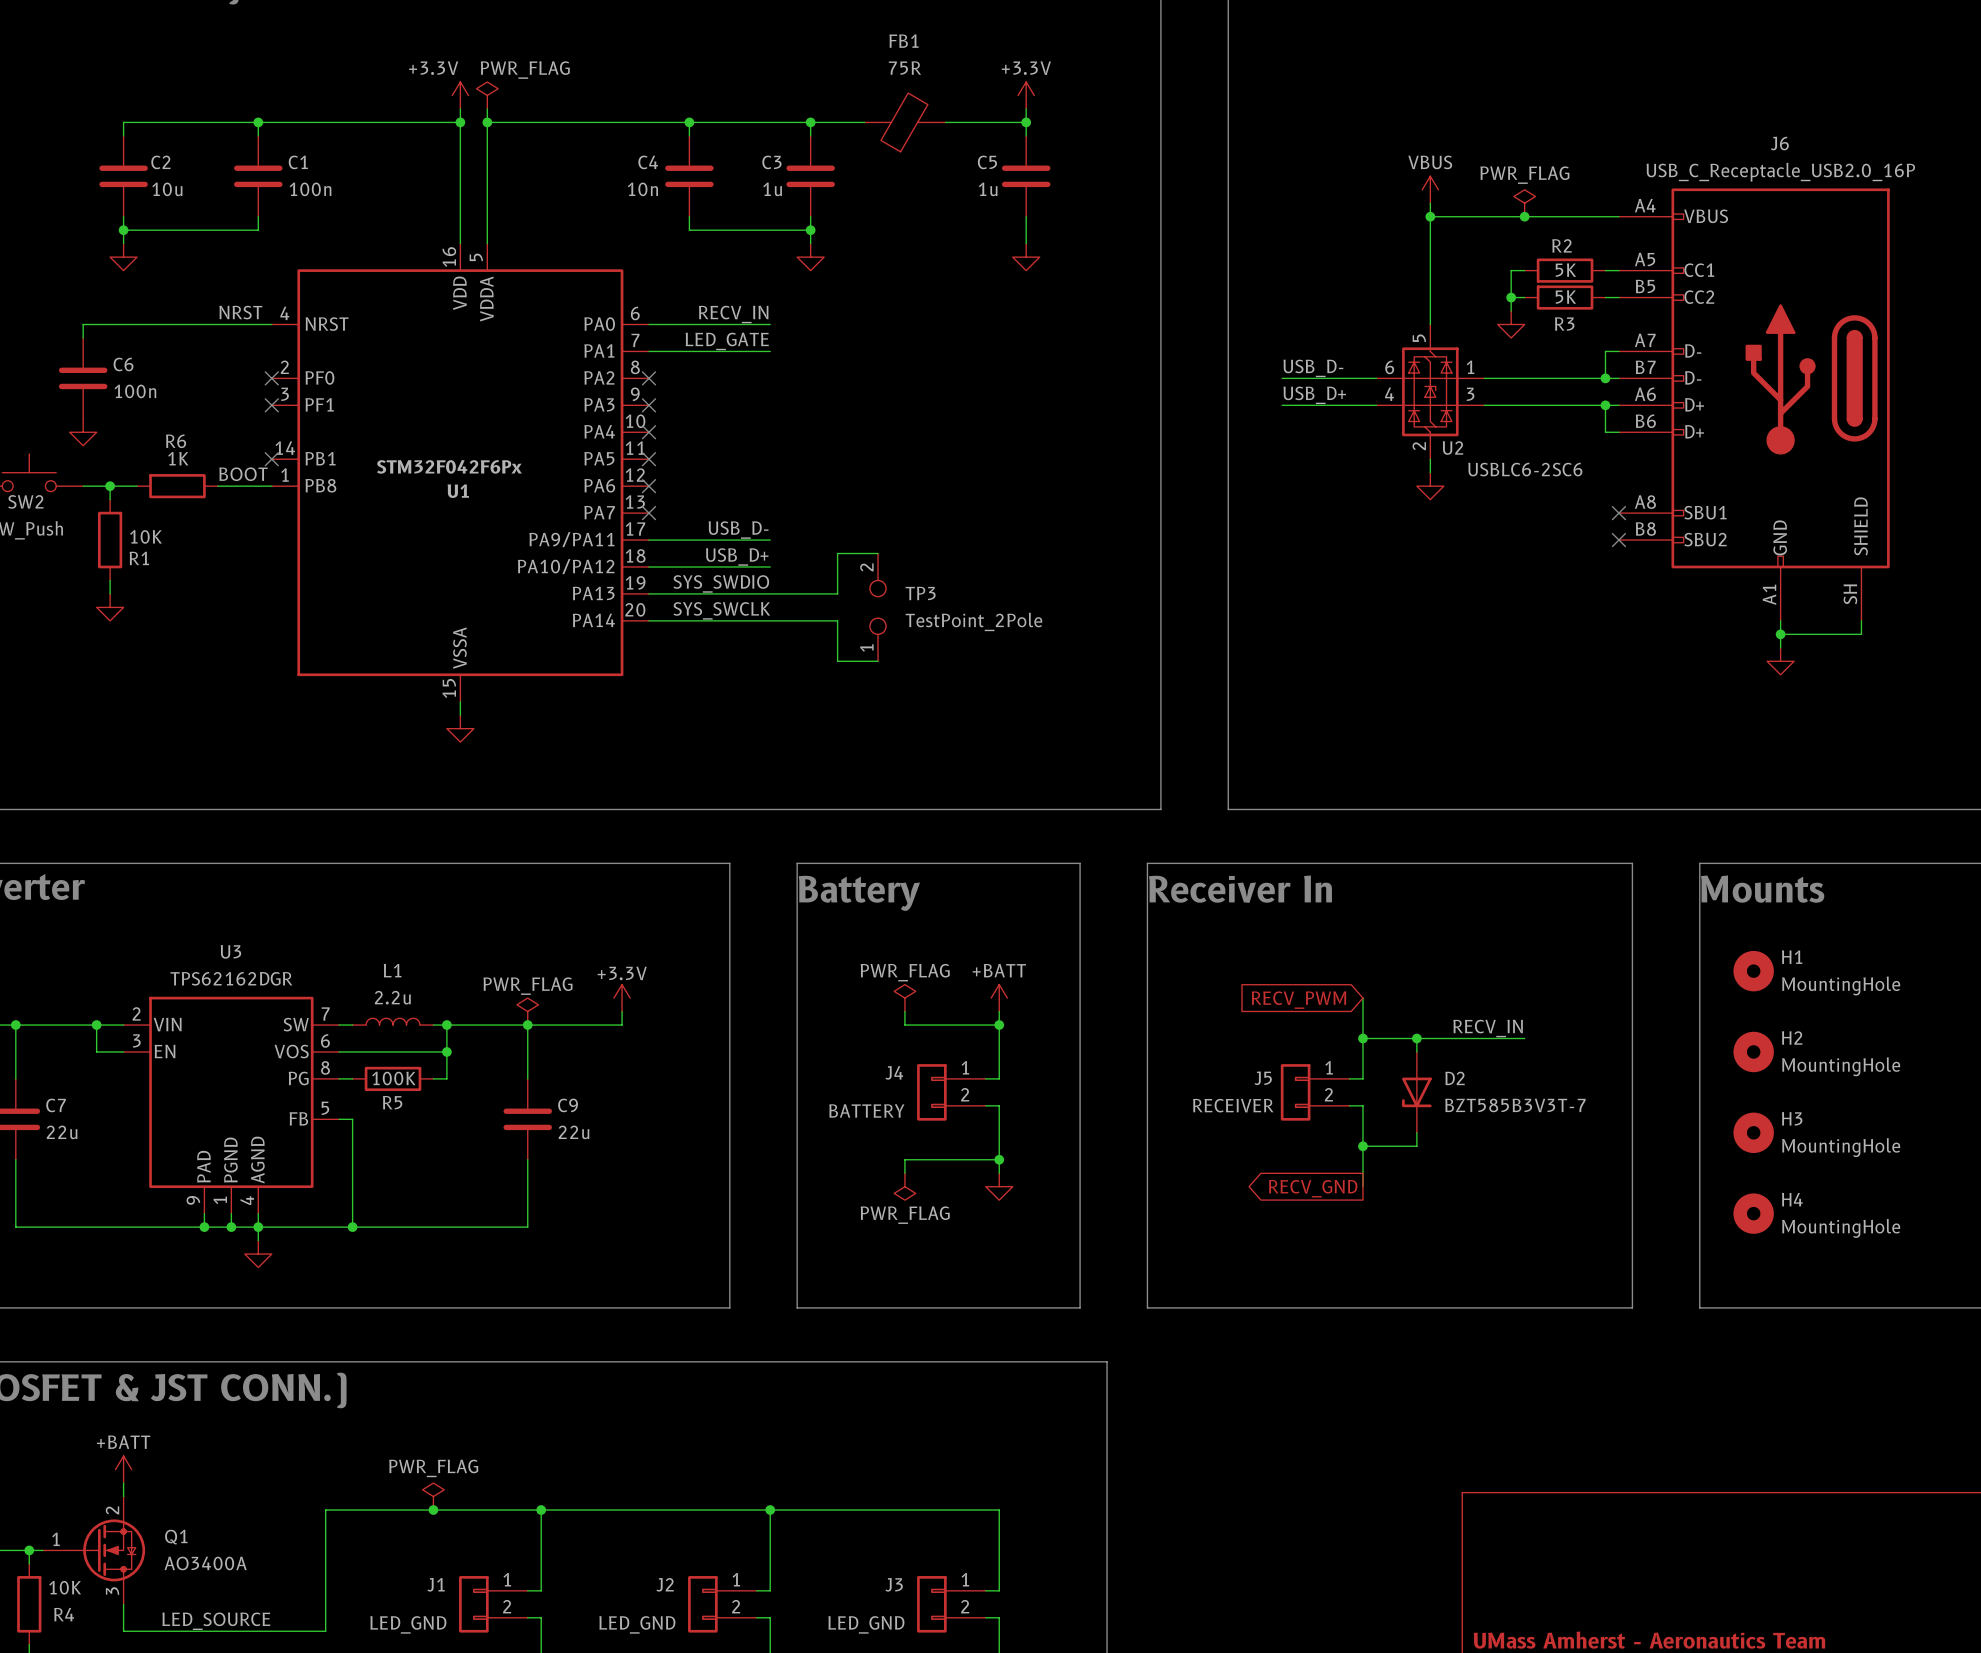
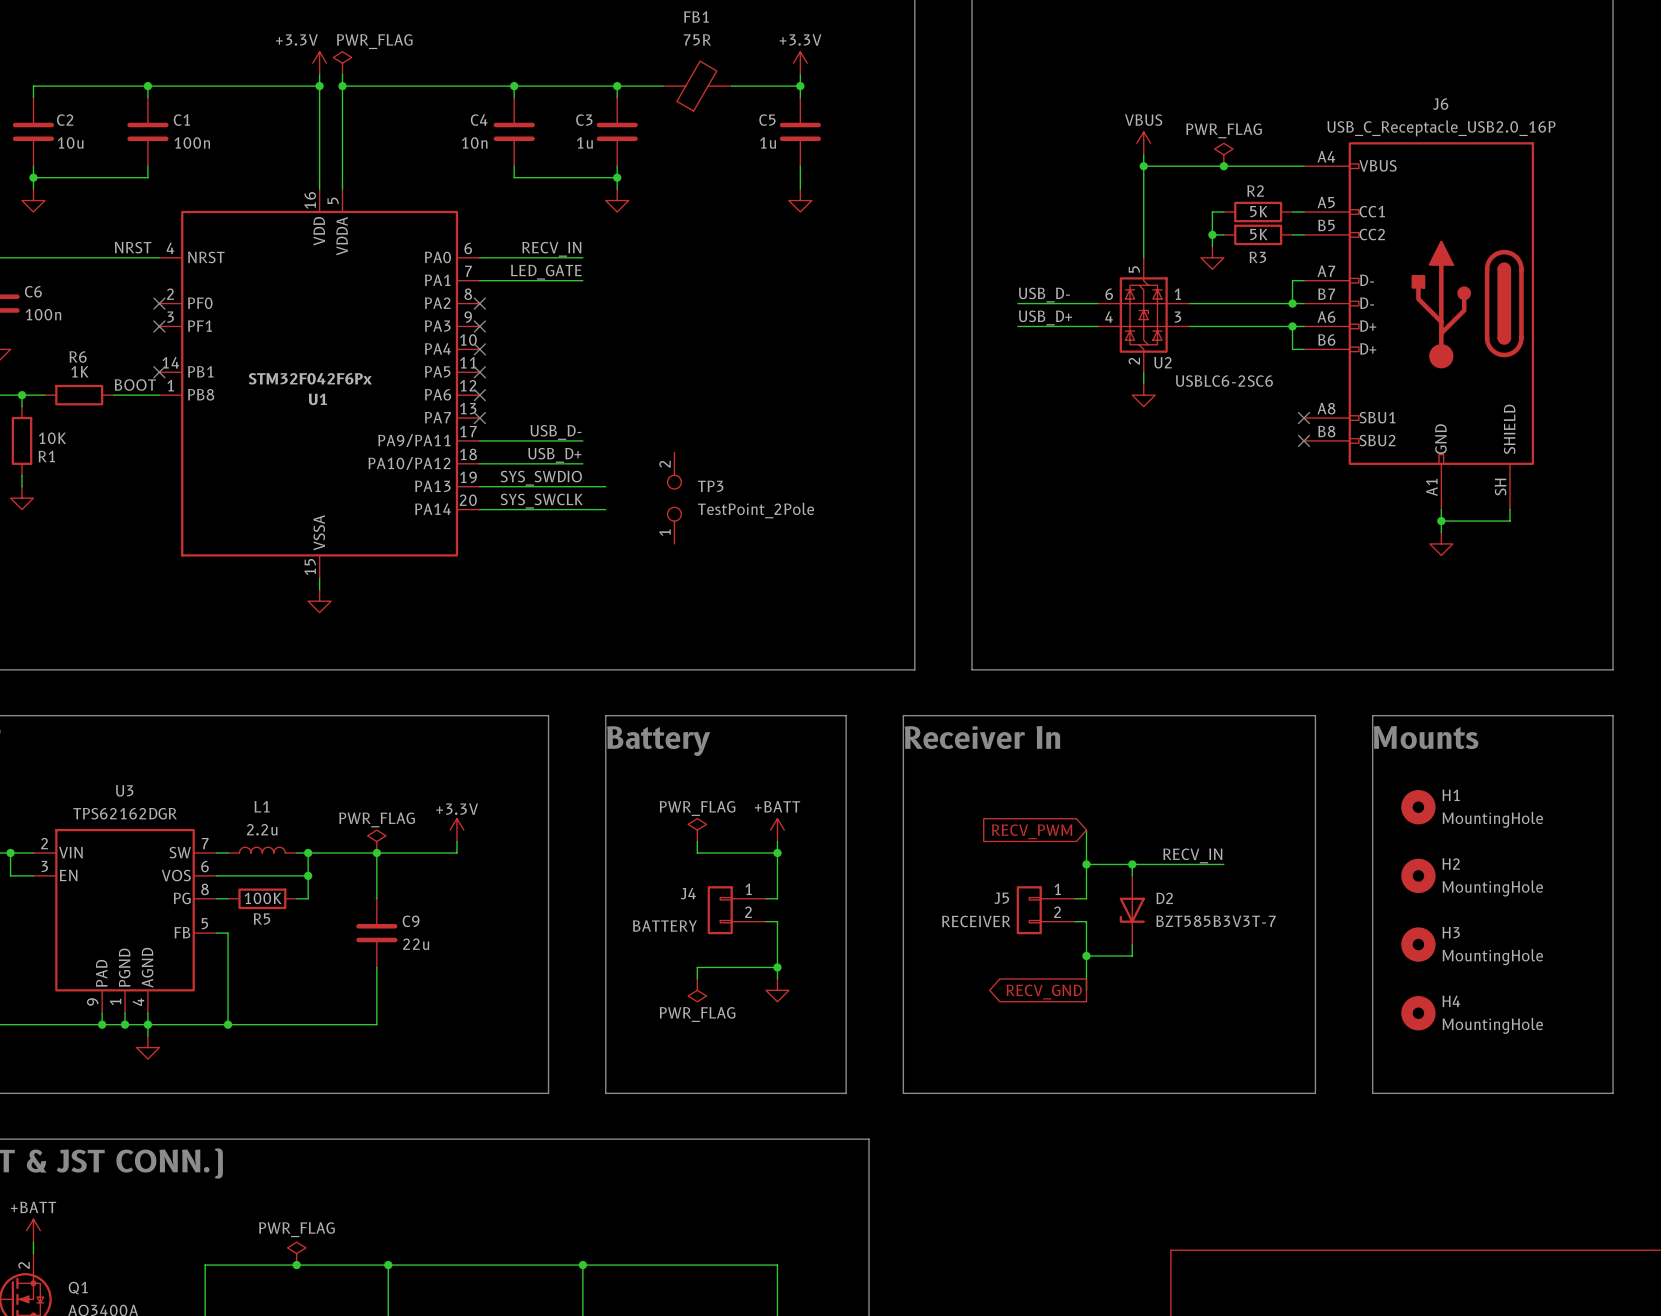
wire: (878, 553) (837, 553) (837, 593) (797, 593) -> none
wire: (797, 620) (837, 620) (837, 661) (878, 661) -> none

